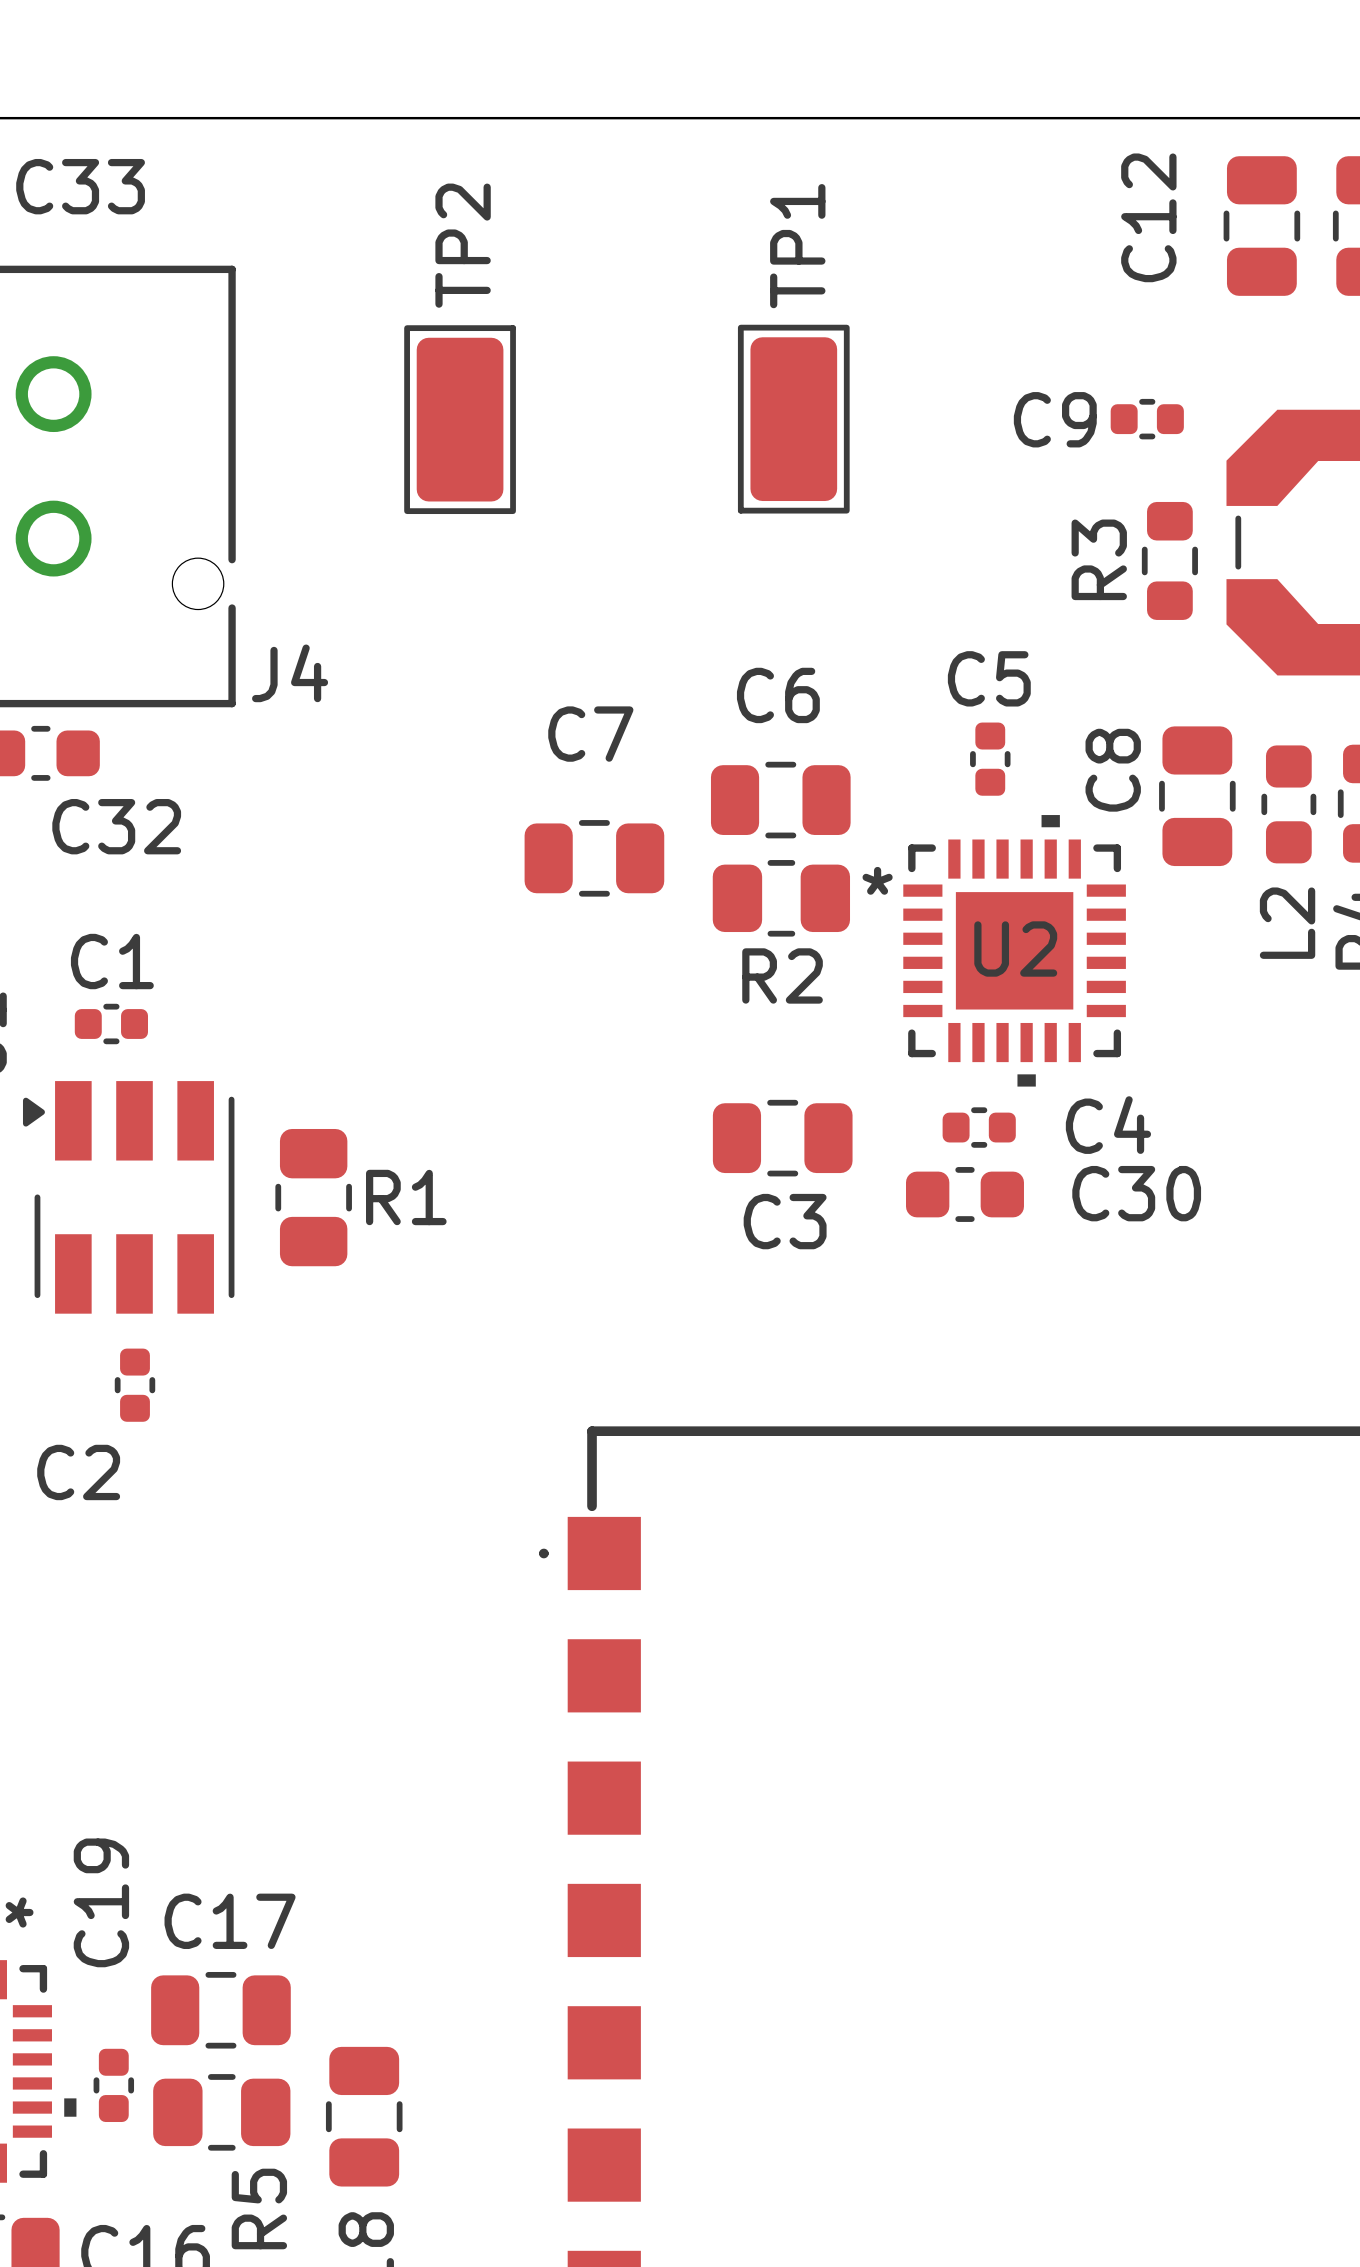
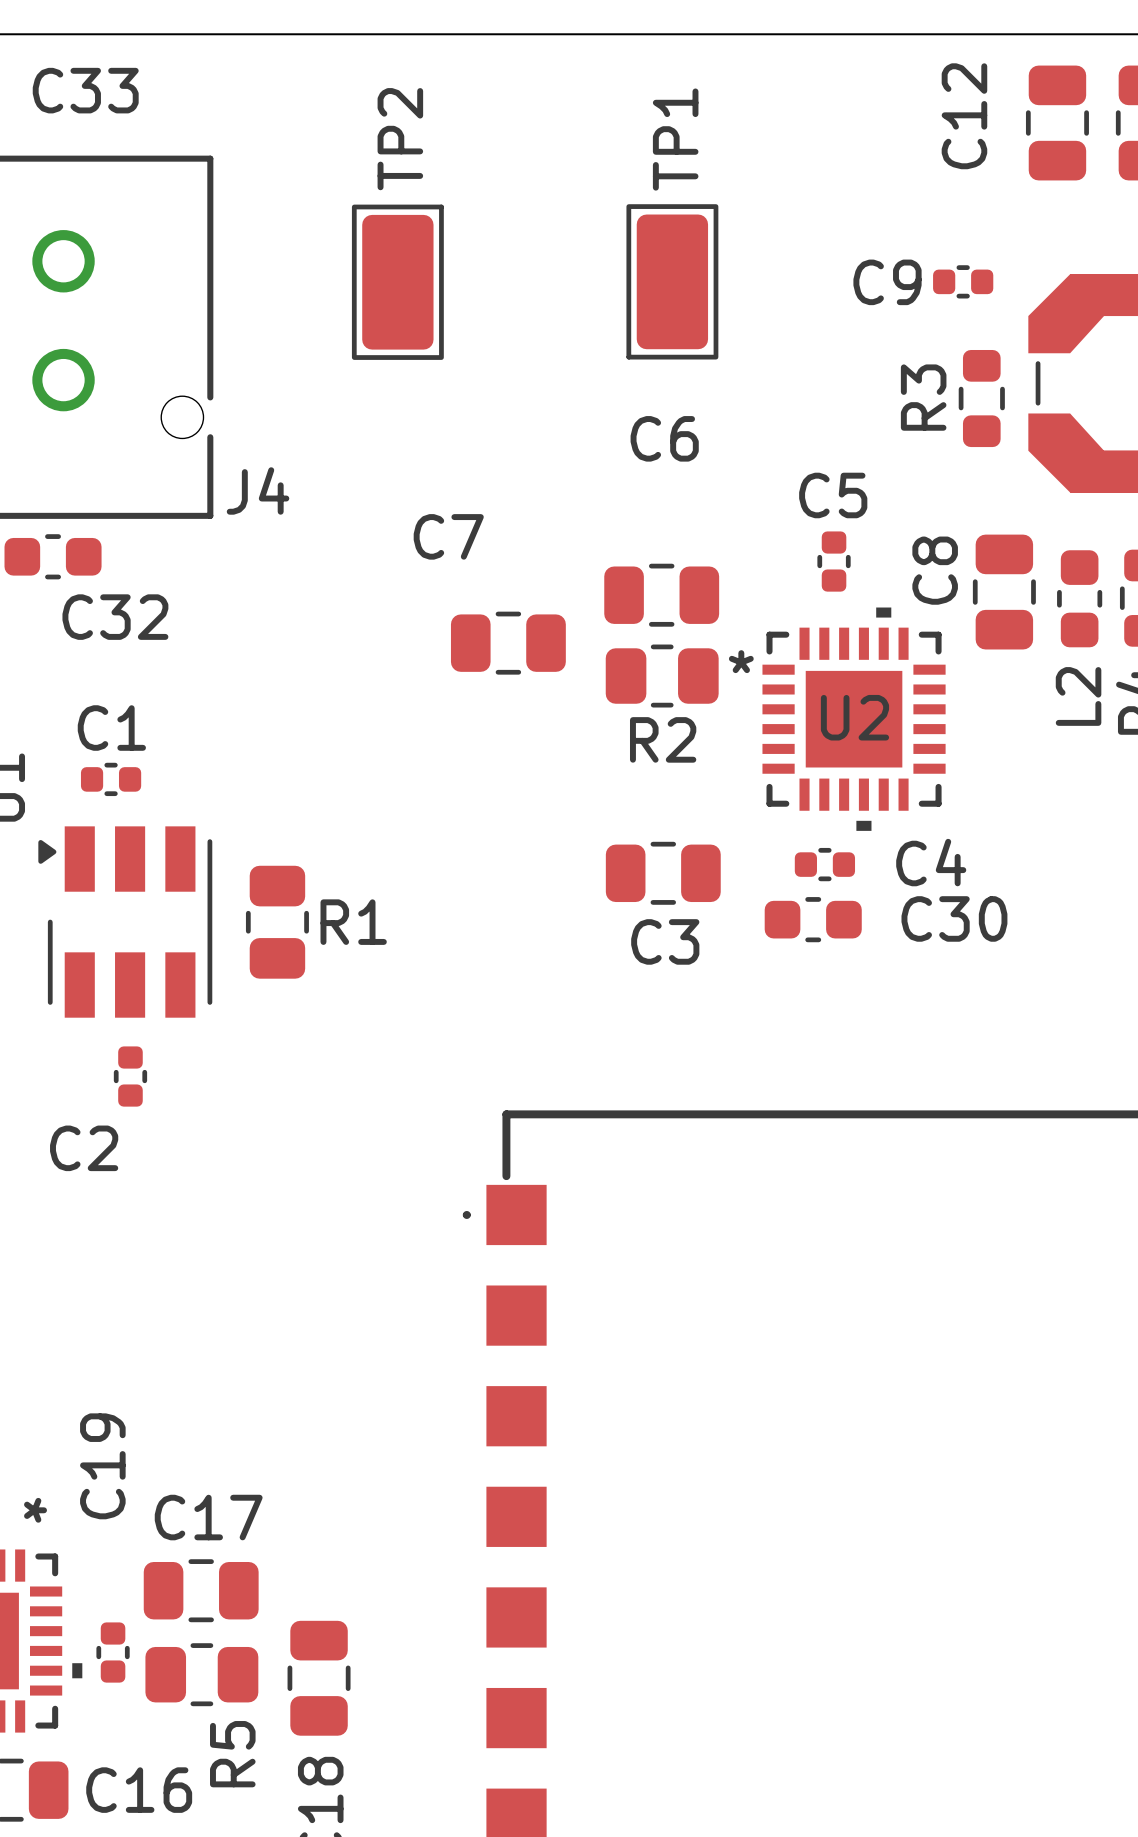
C6 name position: C6 (778, 695) -> C6 (664, 438)
C7 name position: C7 (590, 734) -> C7 (448, 536)
C19 name position: C19 (101, 1902) -> C19 (102, 1466)

